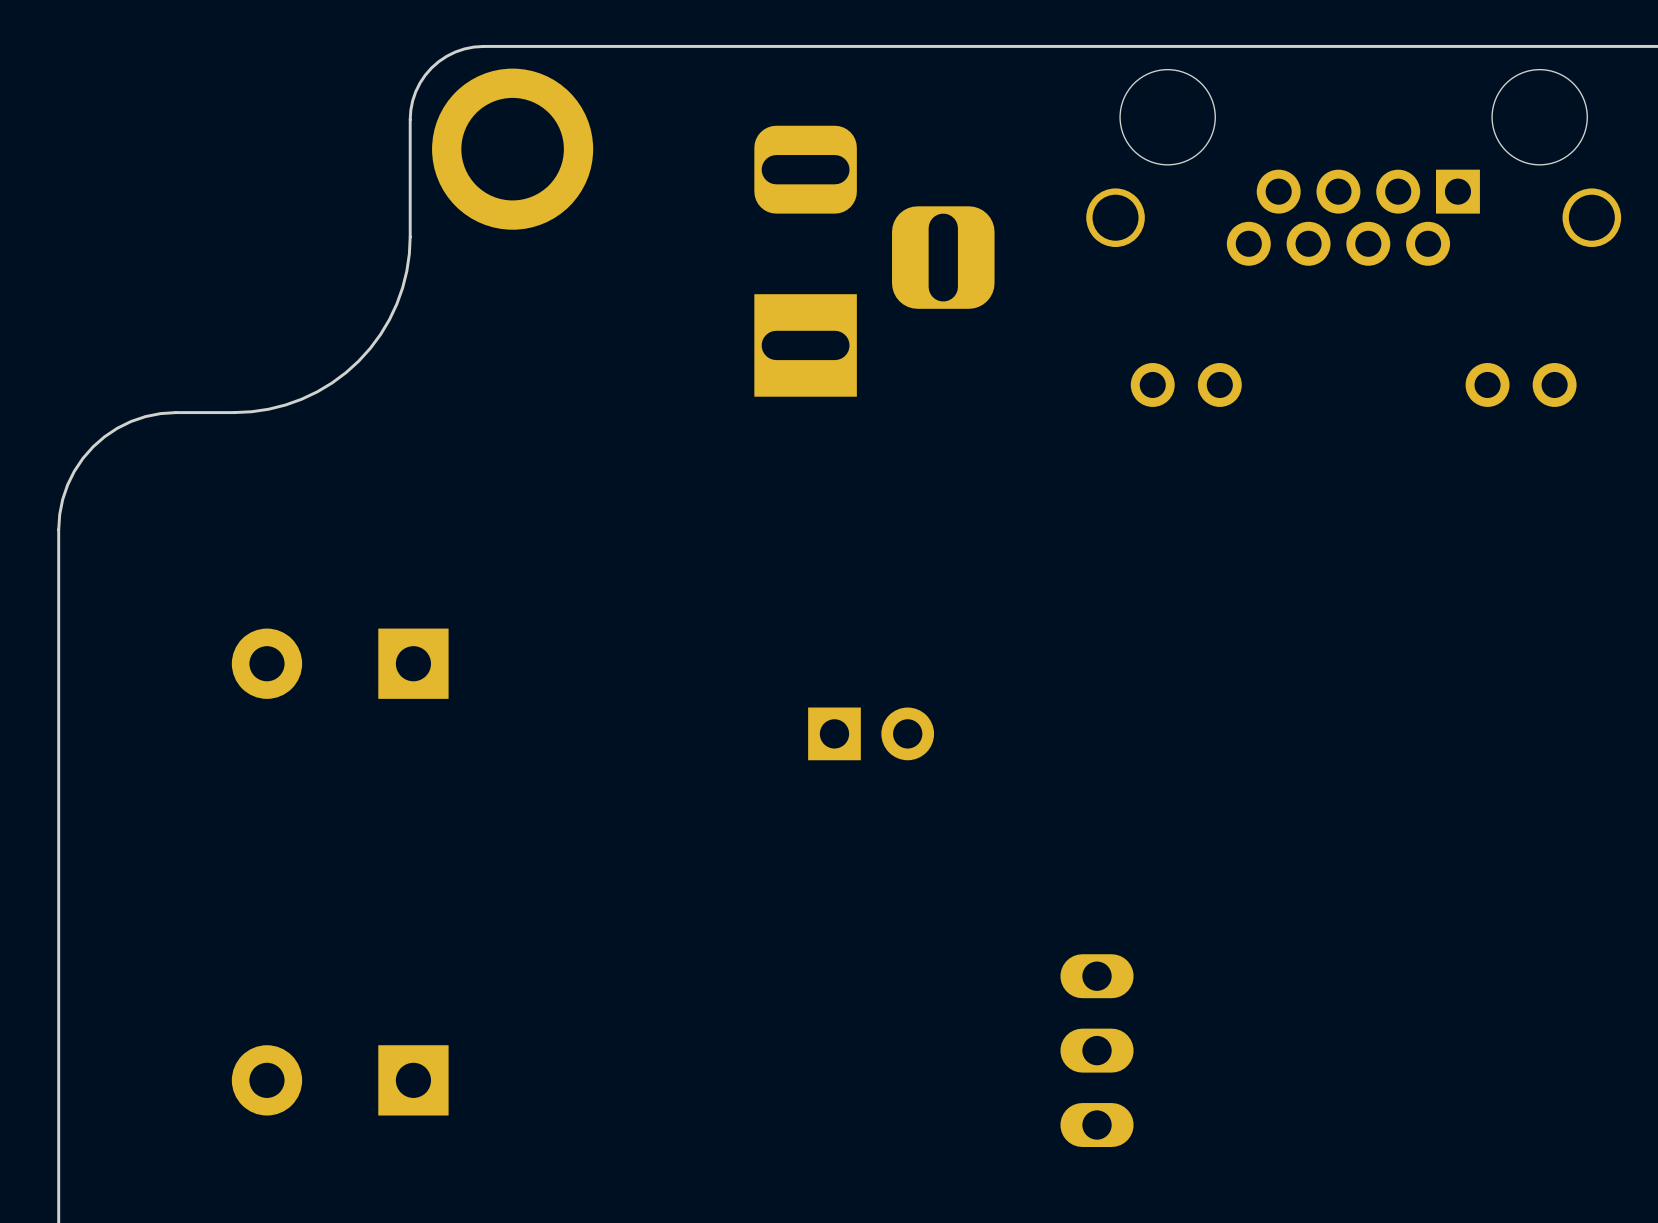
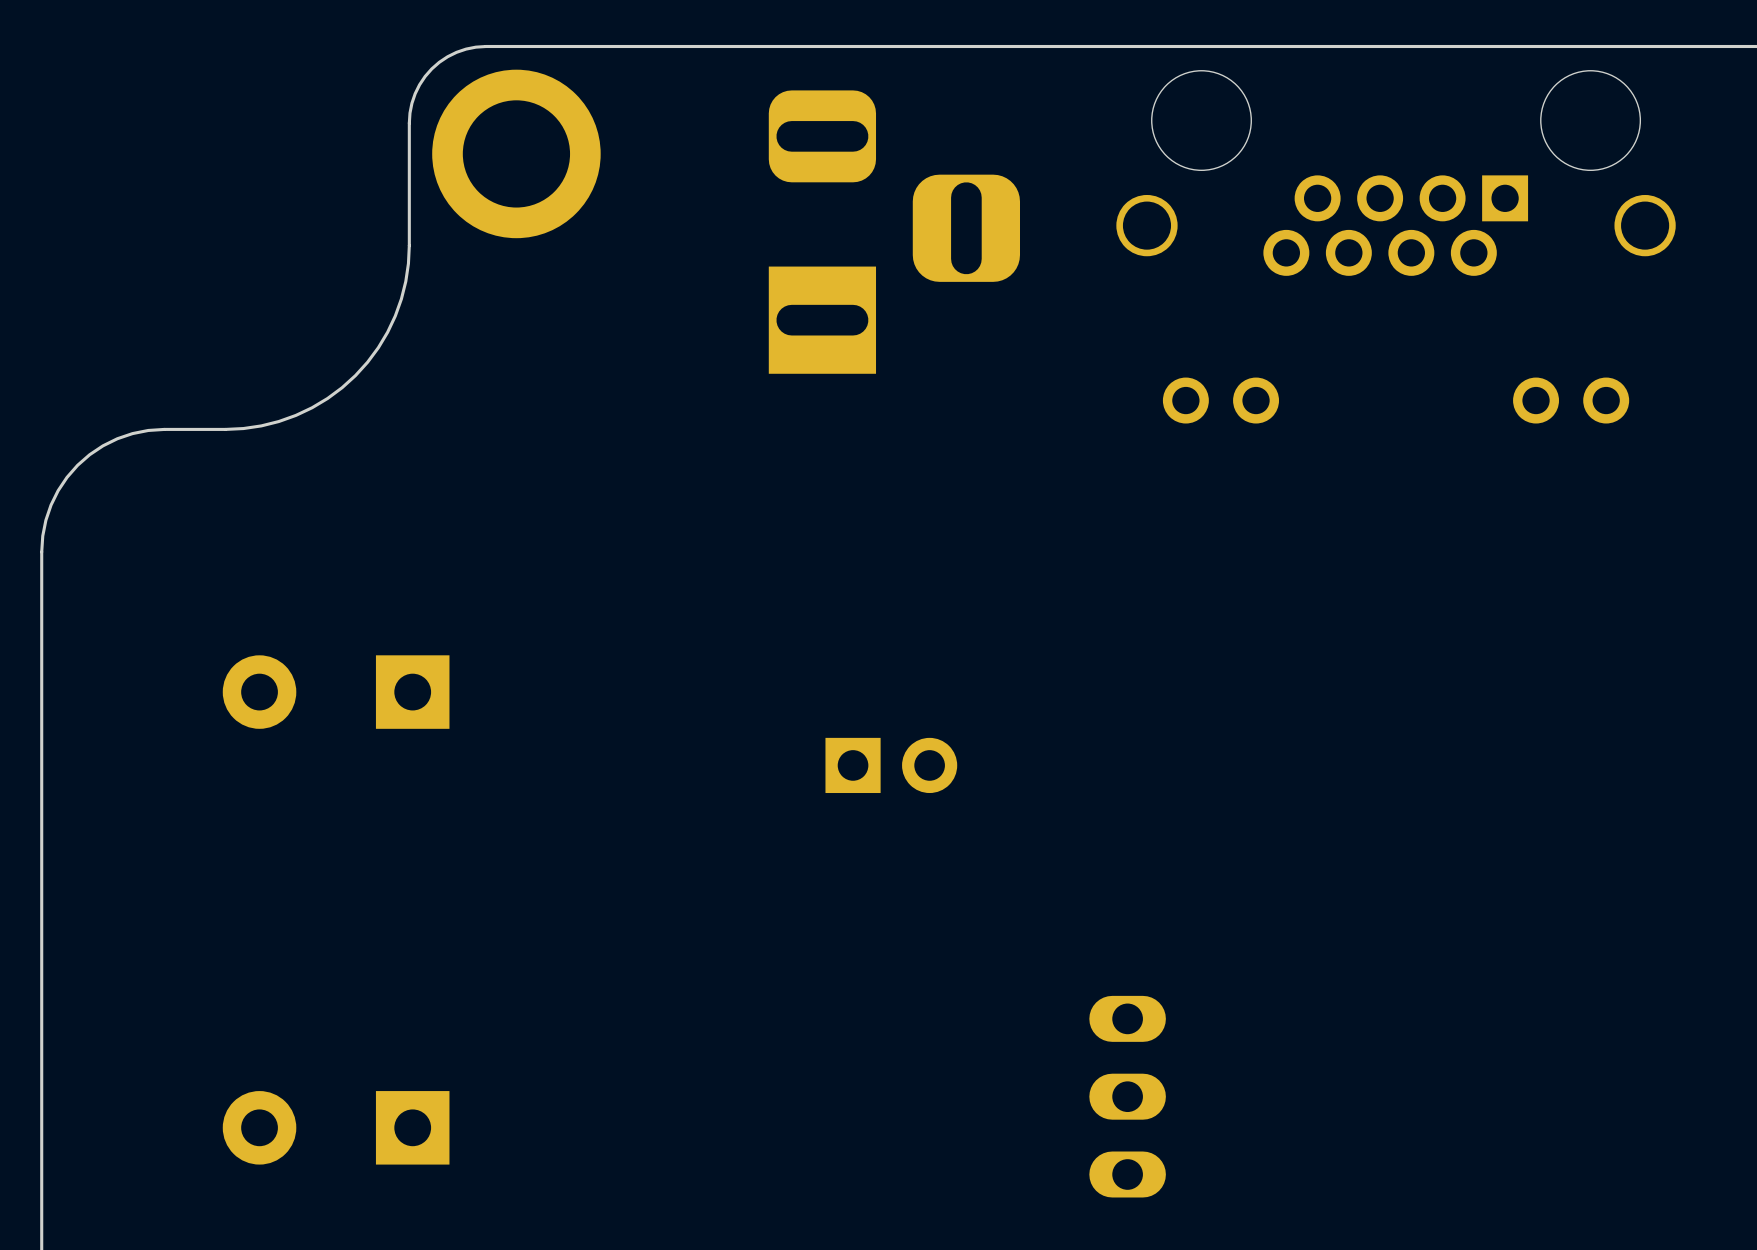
part position: (874, 261) -> (894, 232)

